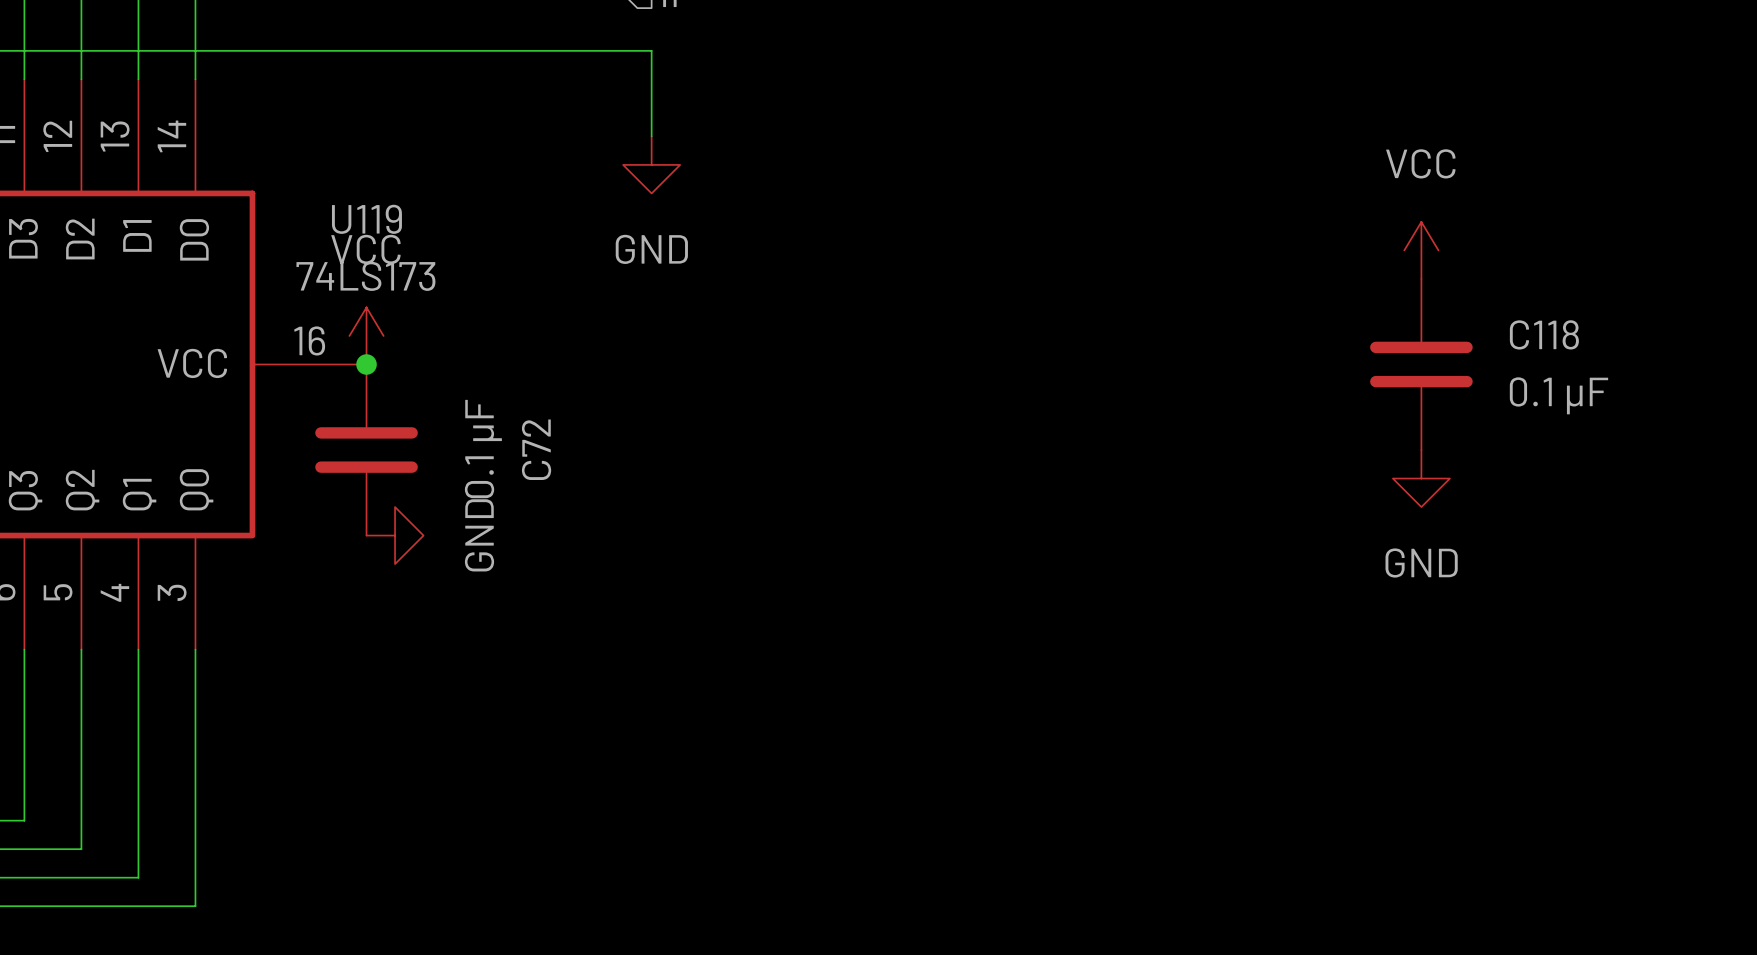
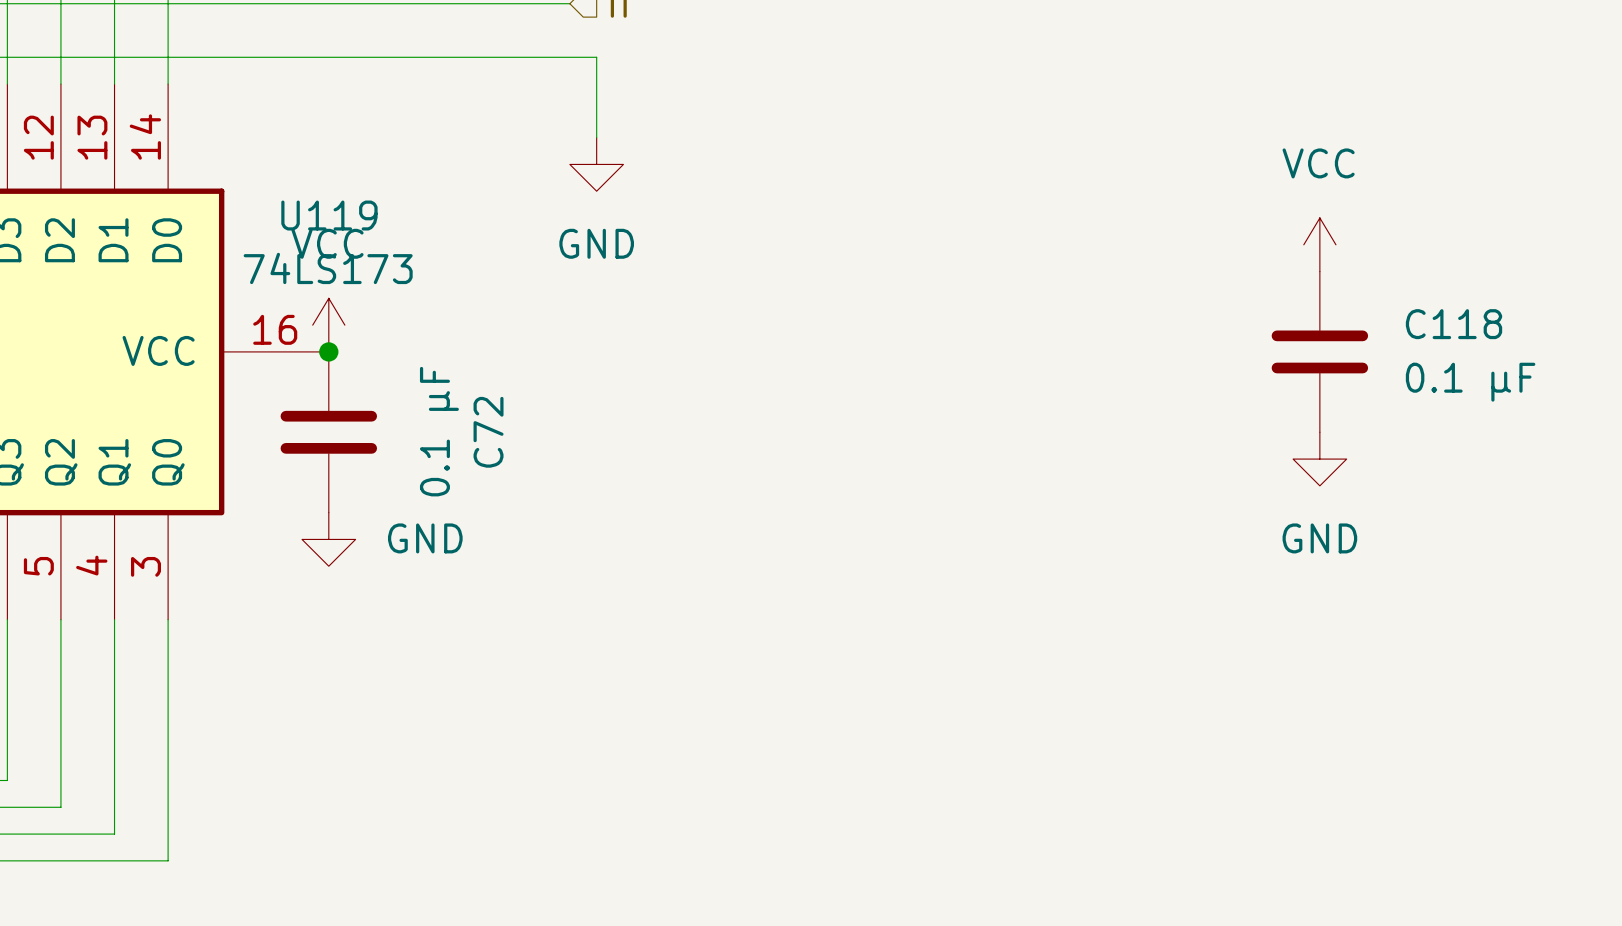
power symbol rotation: 0° (395, 535) -> 90° clockwise (328, 539)
power symbol position: GND (395, 535) -> GND (328, 539)

